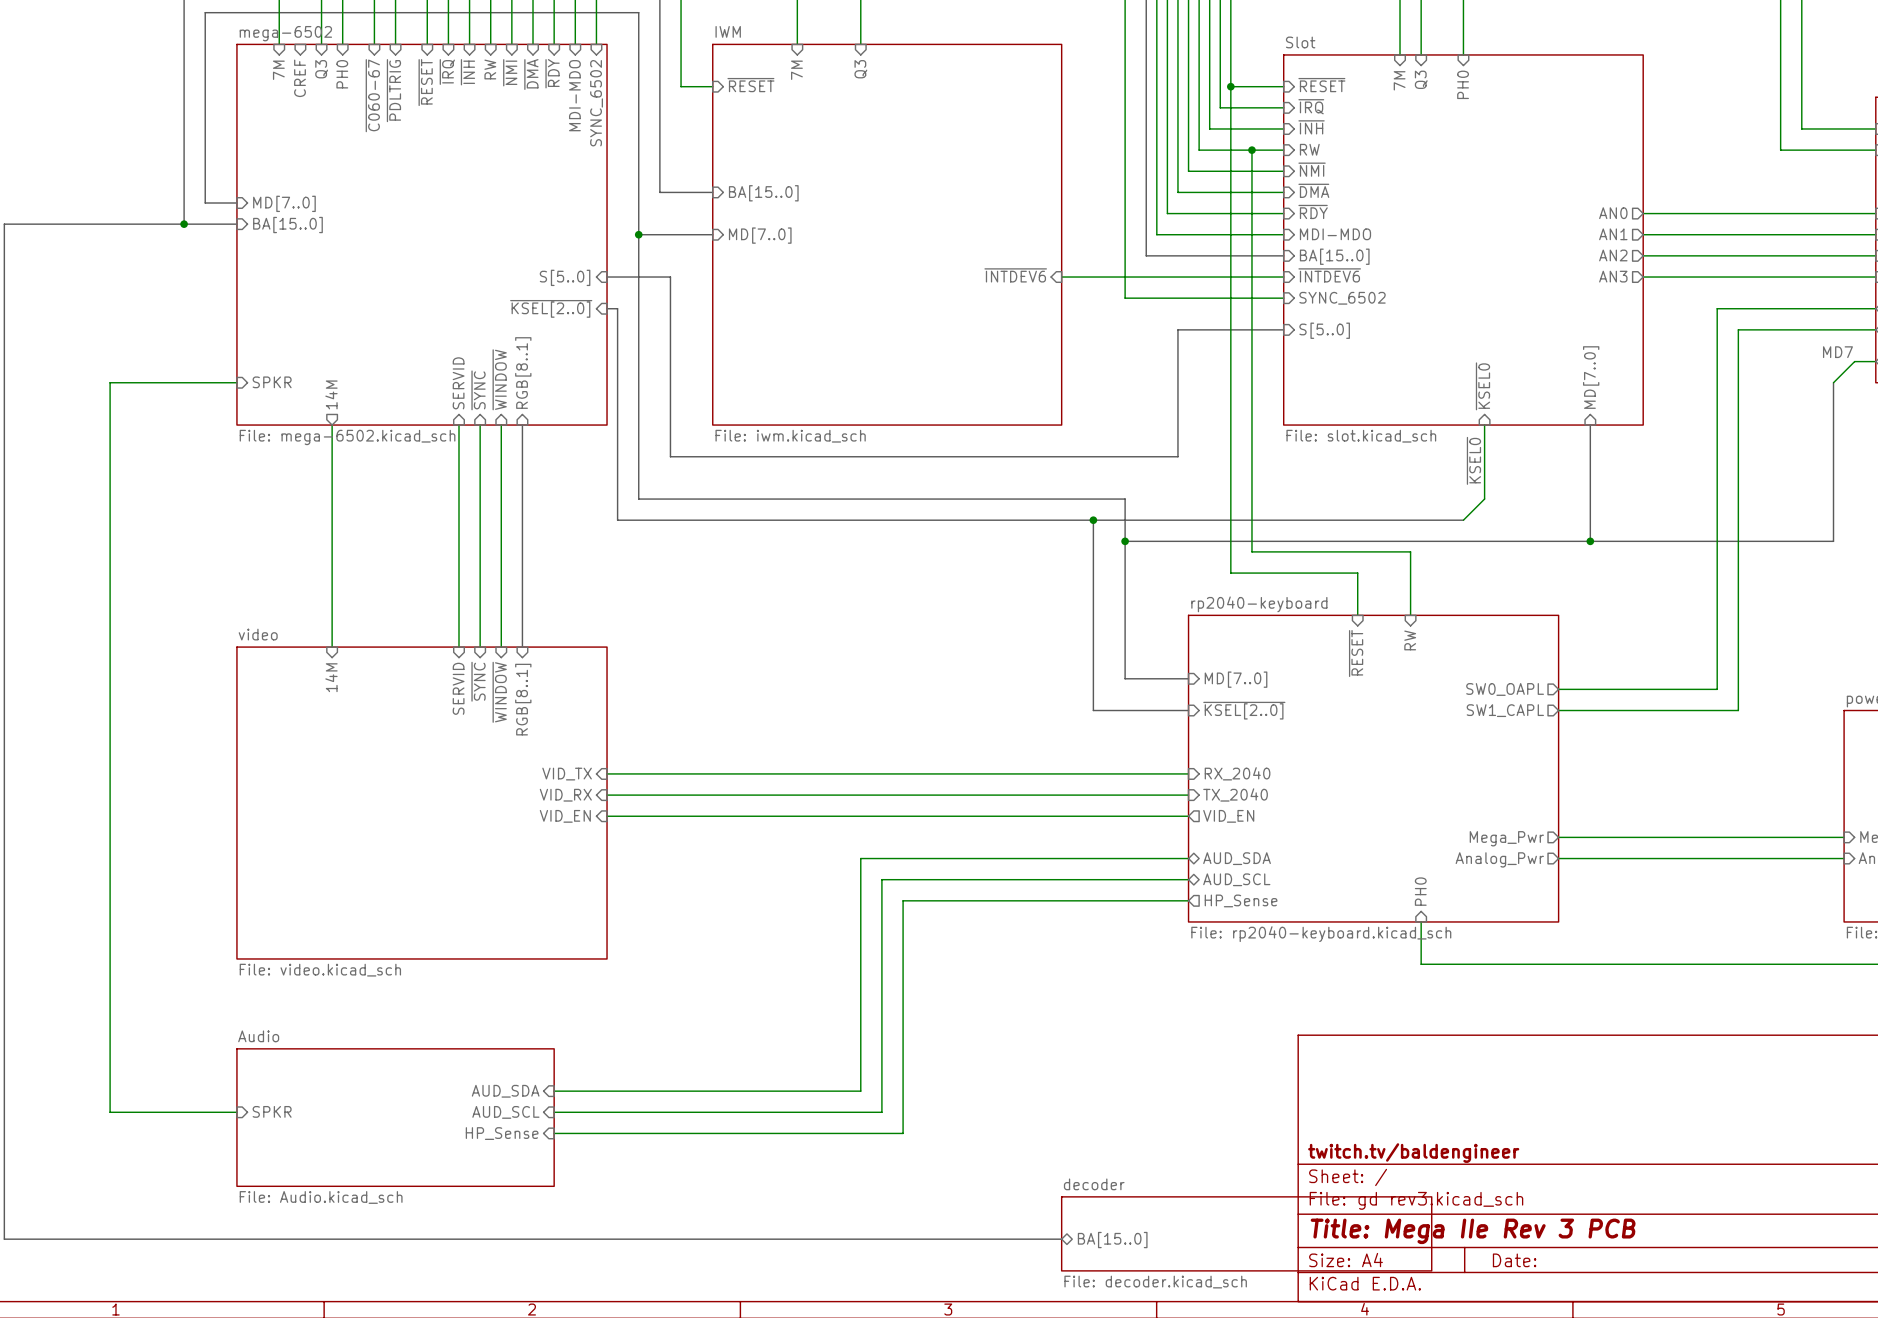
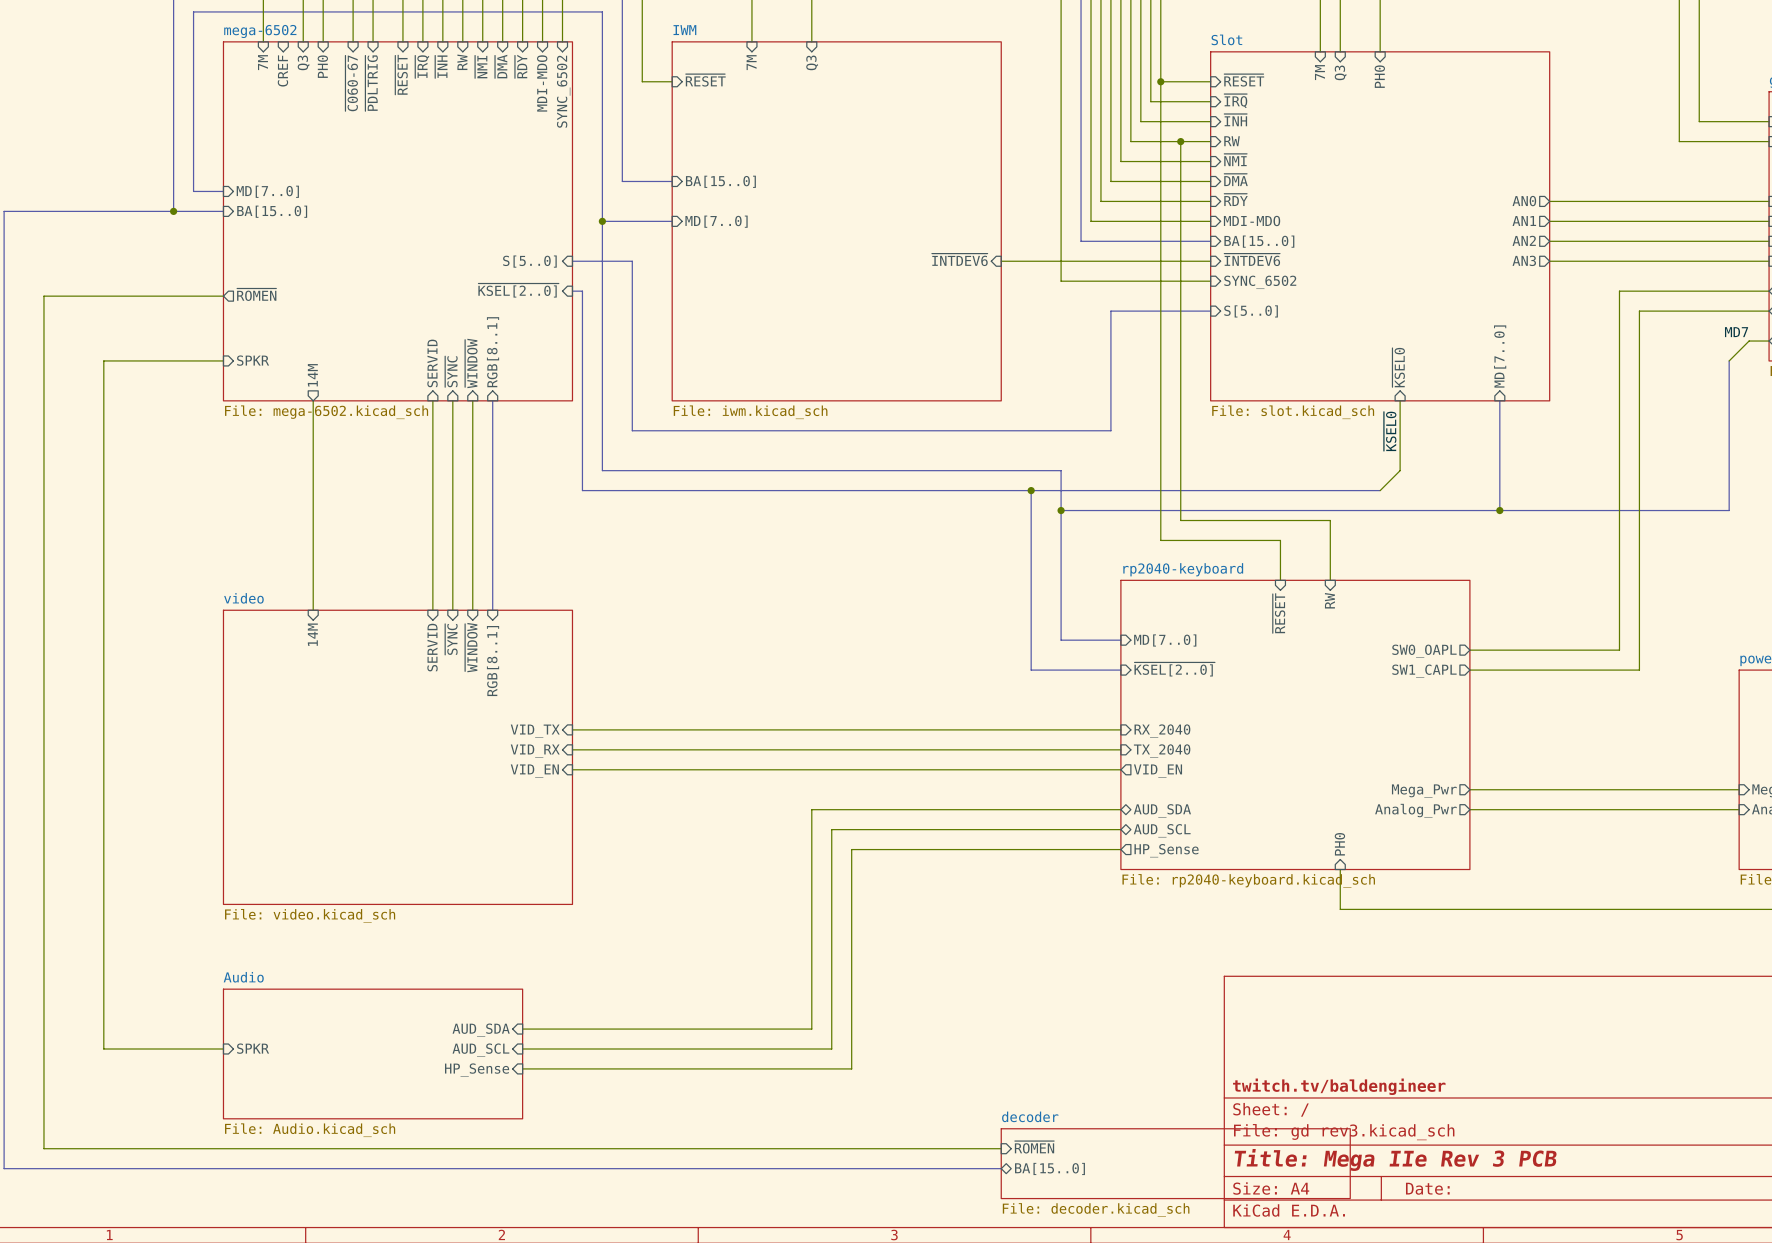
sheet pin: none -> ~{ROMEN} (256, 294)
wire: none -> (223, 296) (43, 296) (43, 1148) (1001, 1148)
sheet pin: none -> ~{ROMEN} (1034, 1147)

